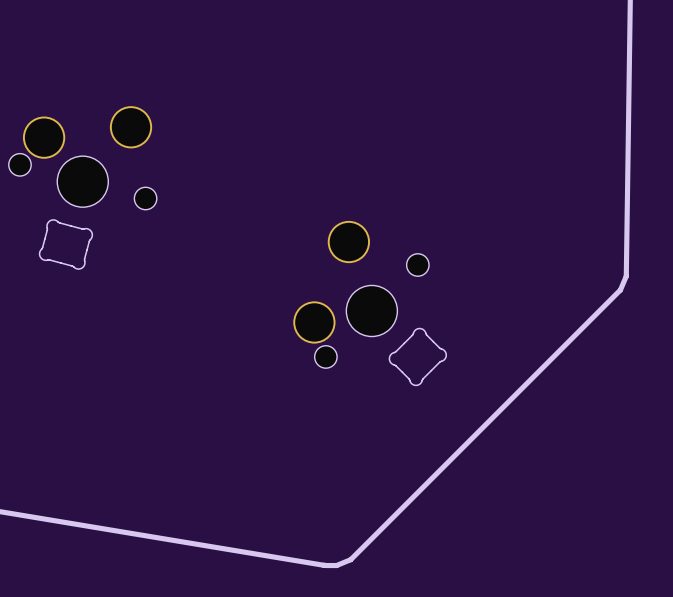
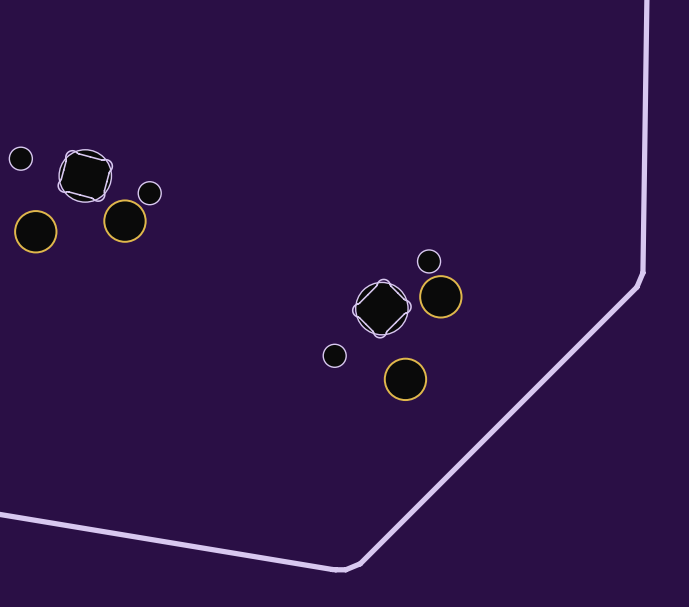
part rotation: 0° (82, 157) -> 180° (85, 200)
part position: (65, 244) -> (85, 175)
part rotation: 0° (361, 294) -> 180° (392, 325)
part position: (417, 356) -> (381, 308)

